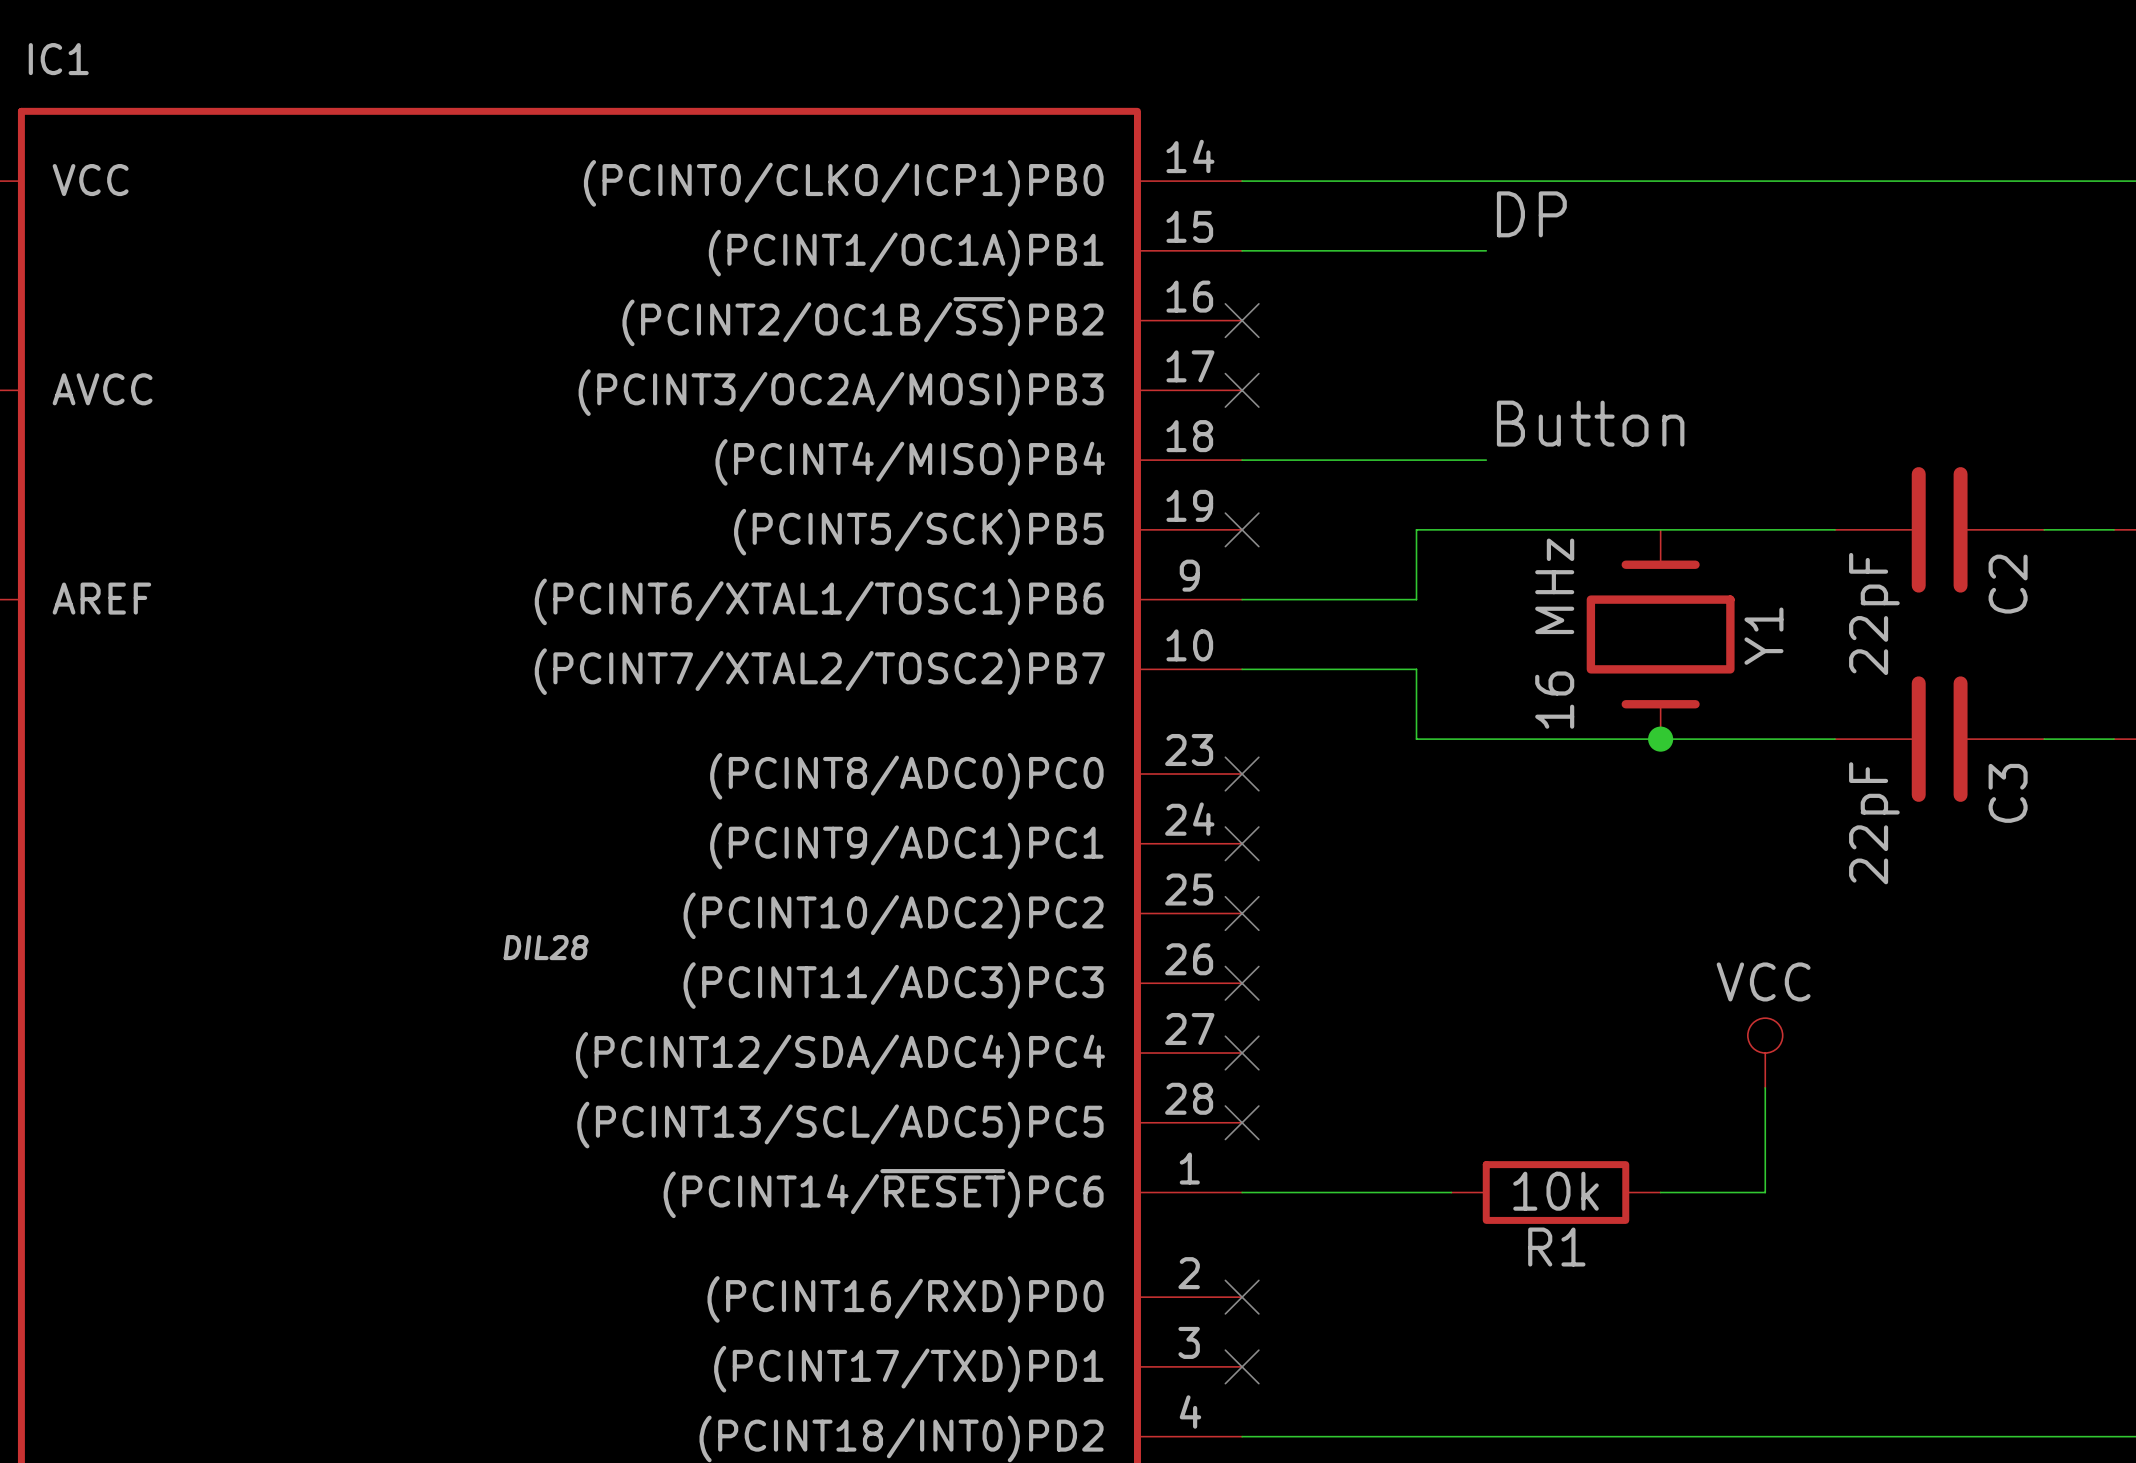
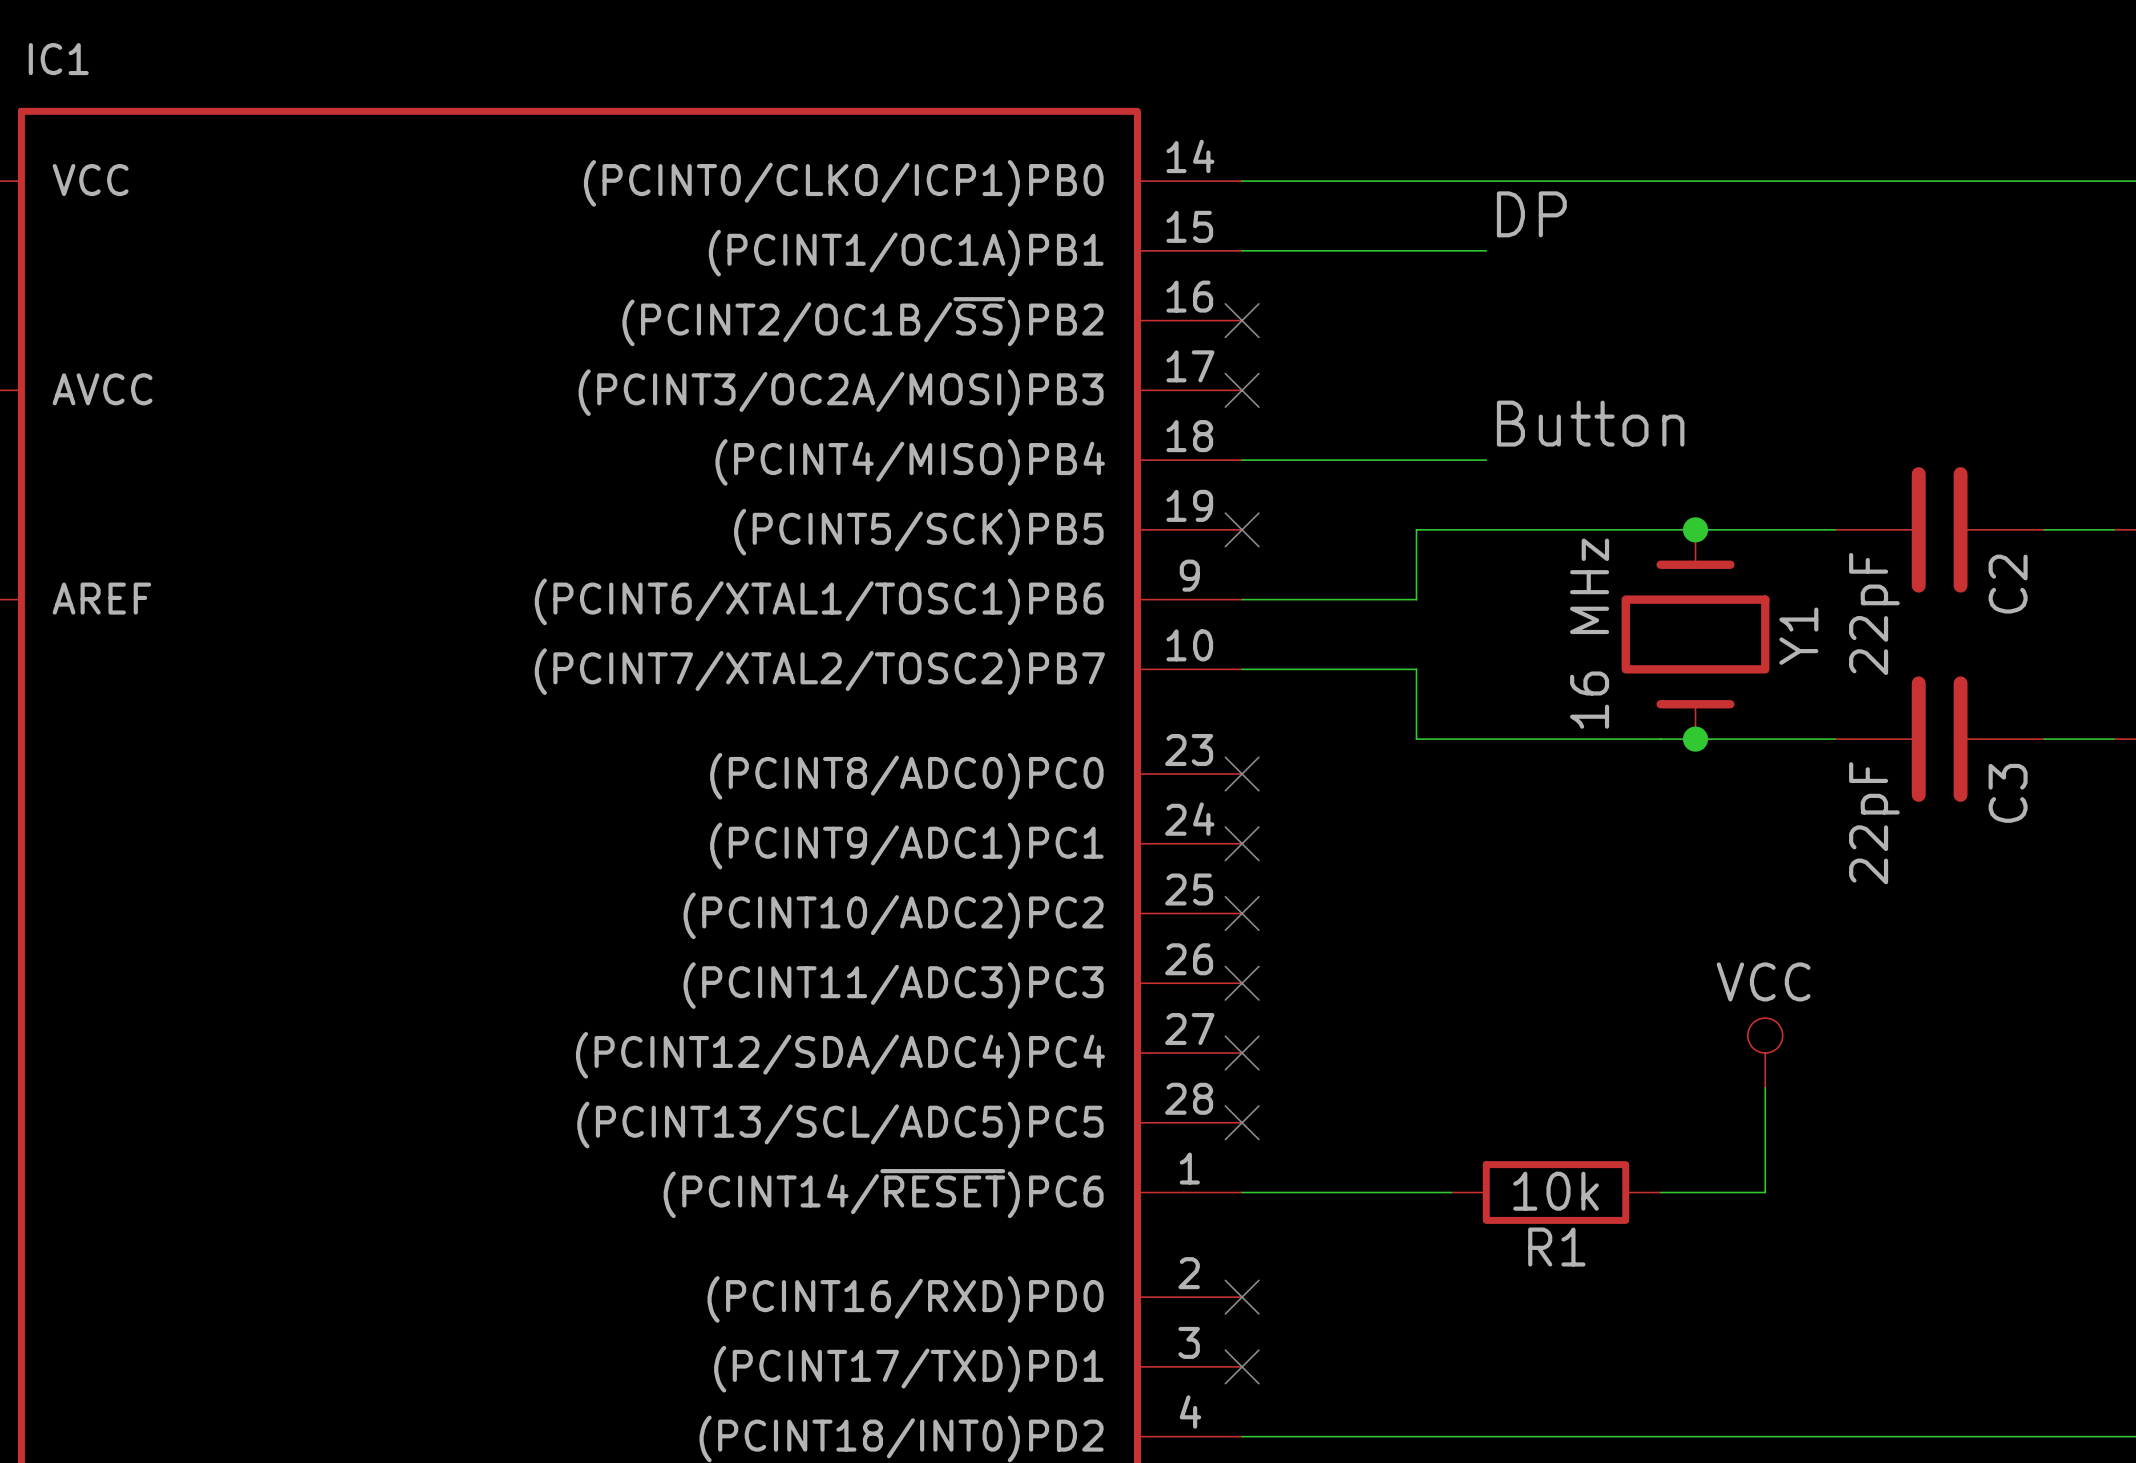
junction: none -> (1695, 529)
Y1 position: (1660, 634) -> (1695, 634)
junction position: (1660, 739) -> (1695, 739)
IC1 text: DIL28 (546, 947) -> none

